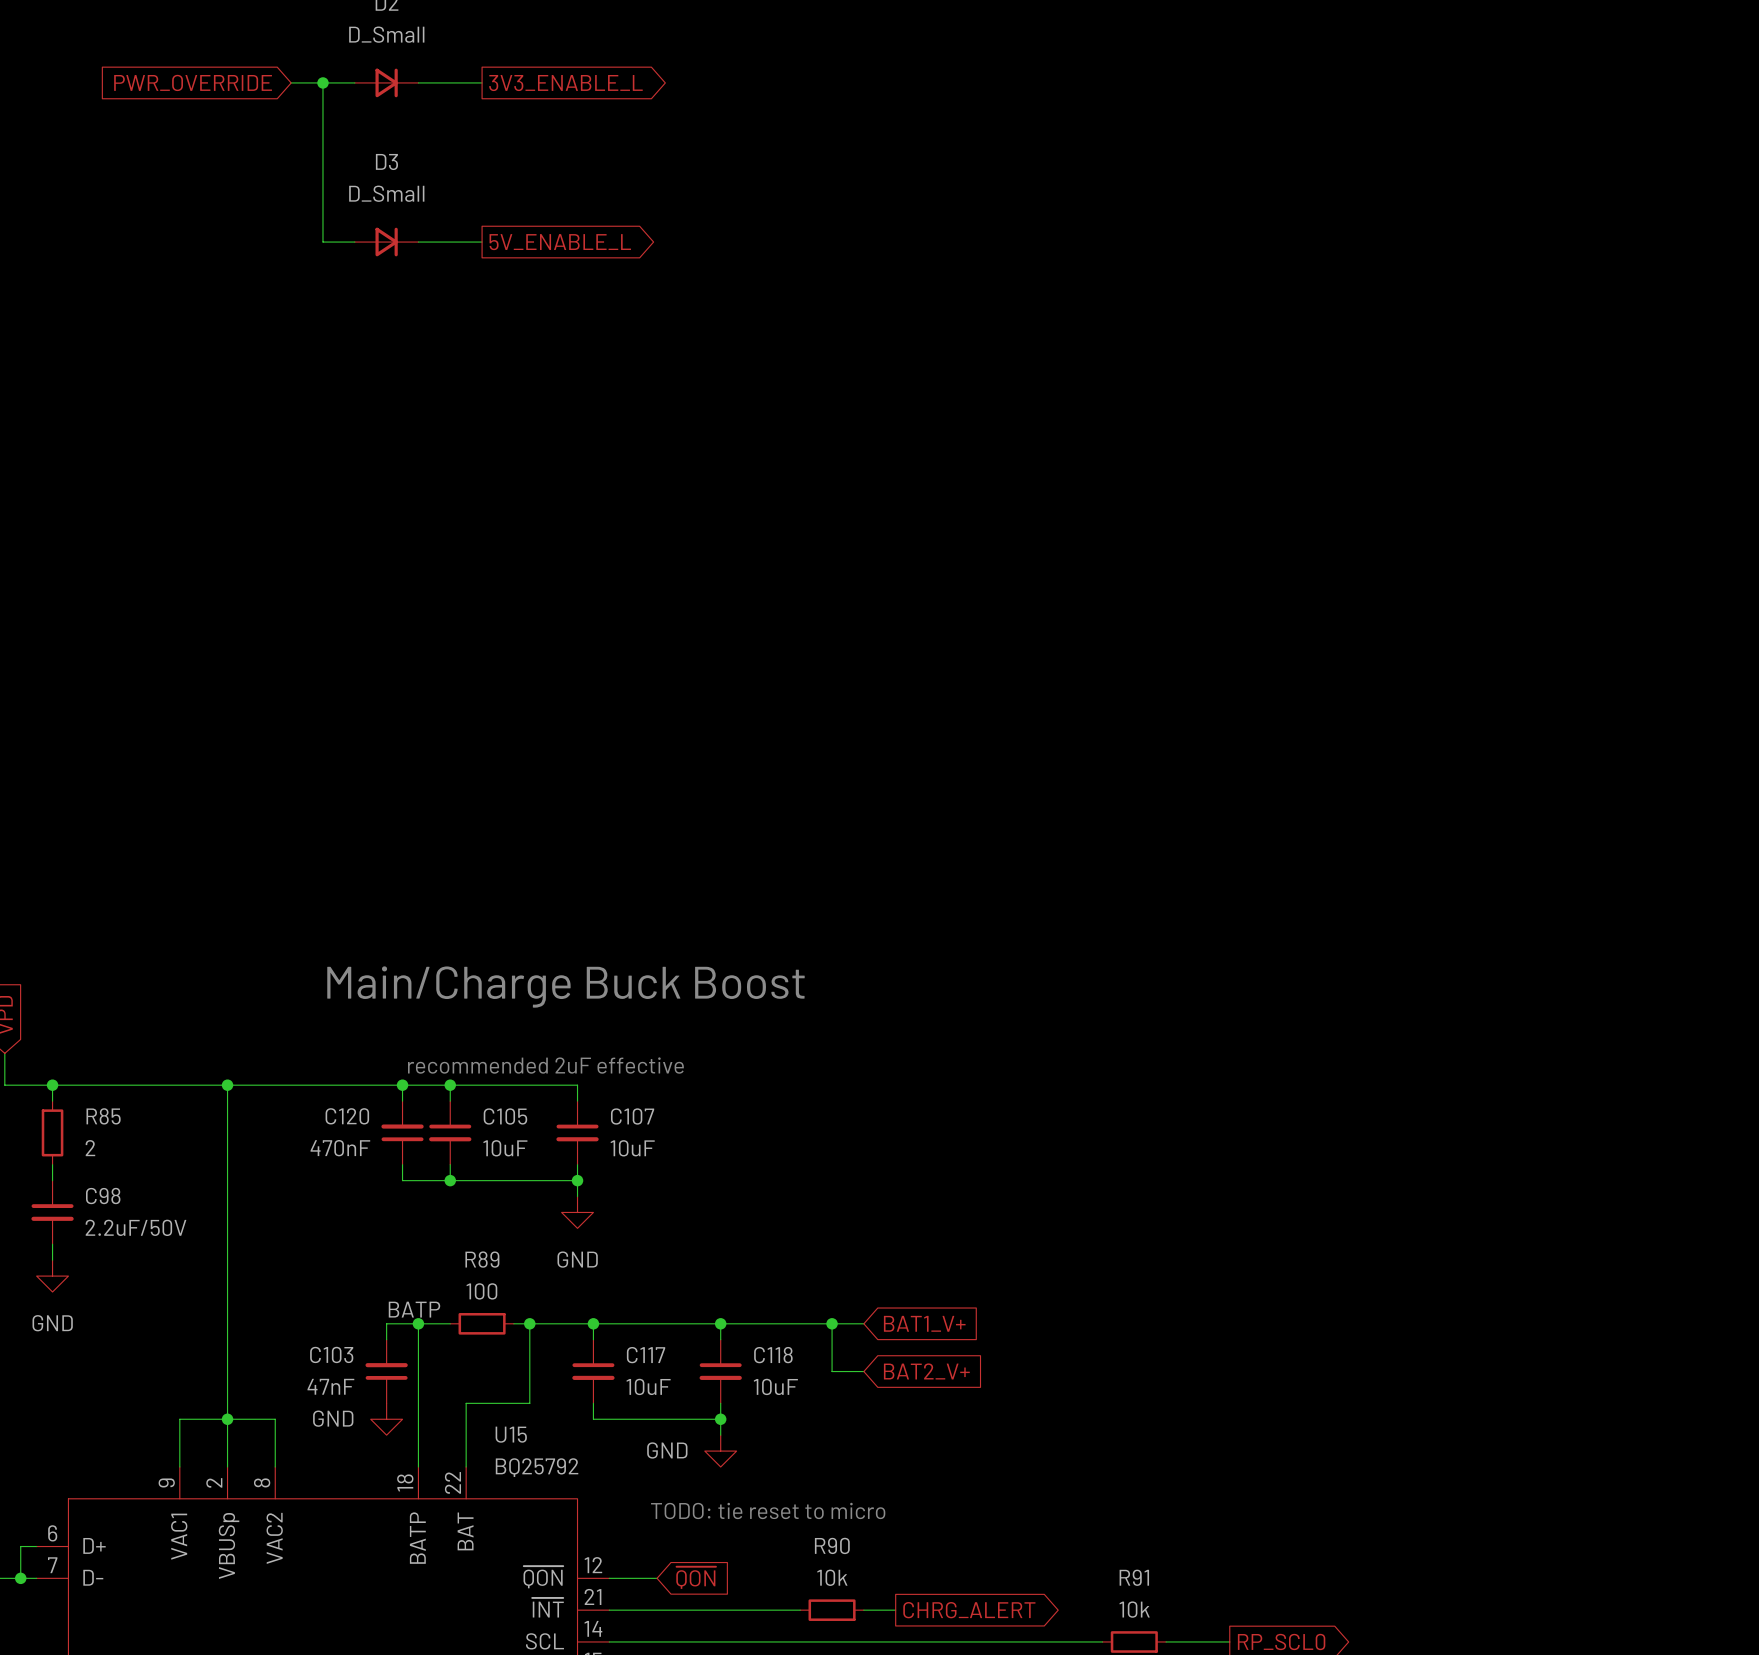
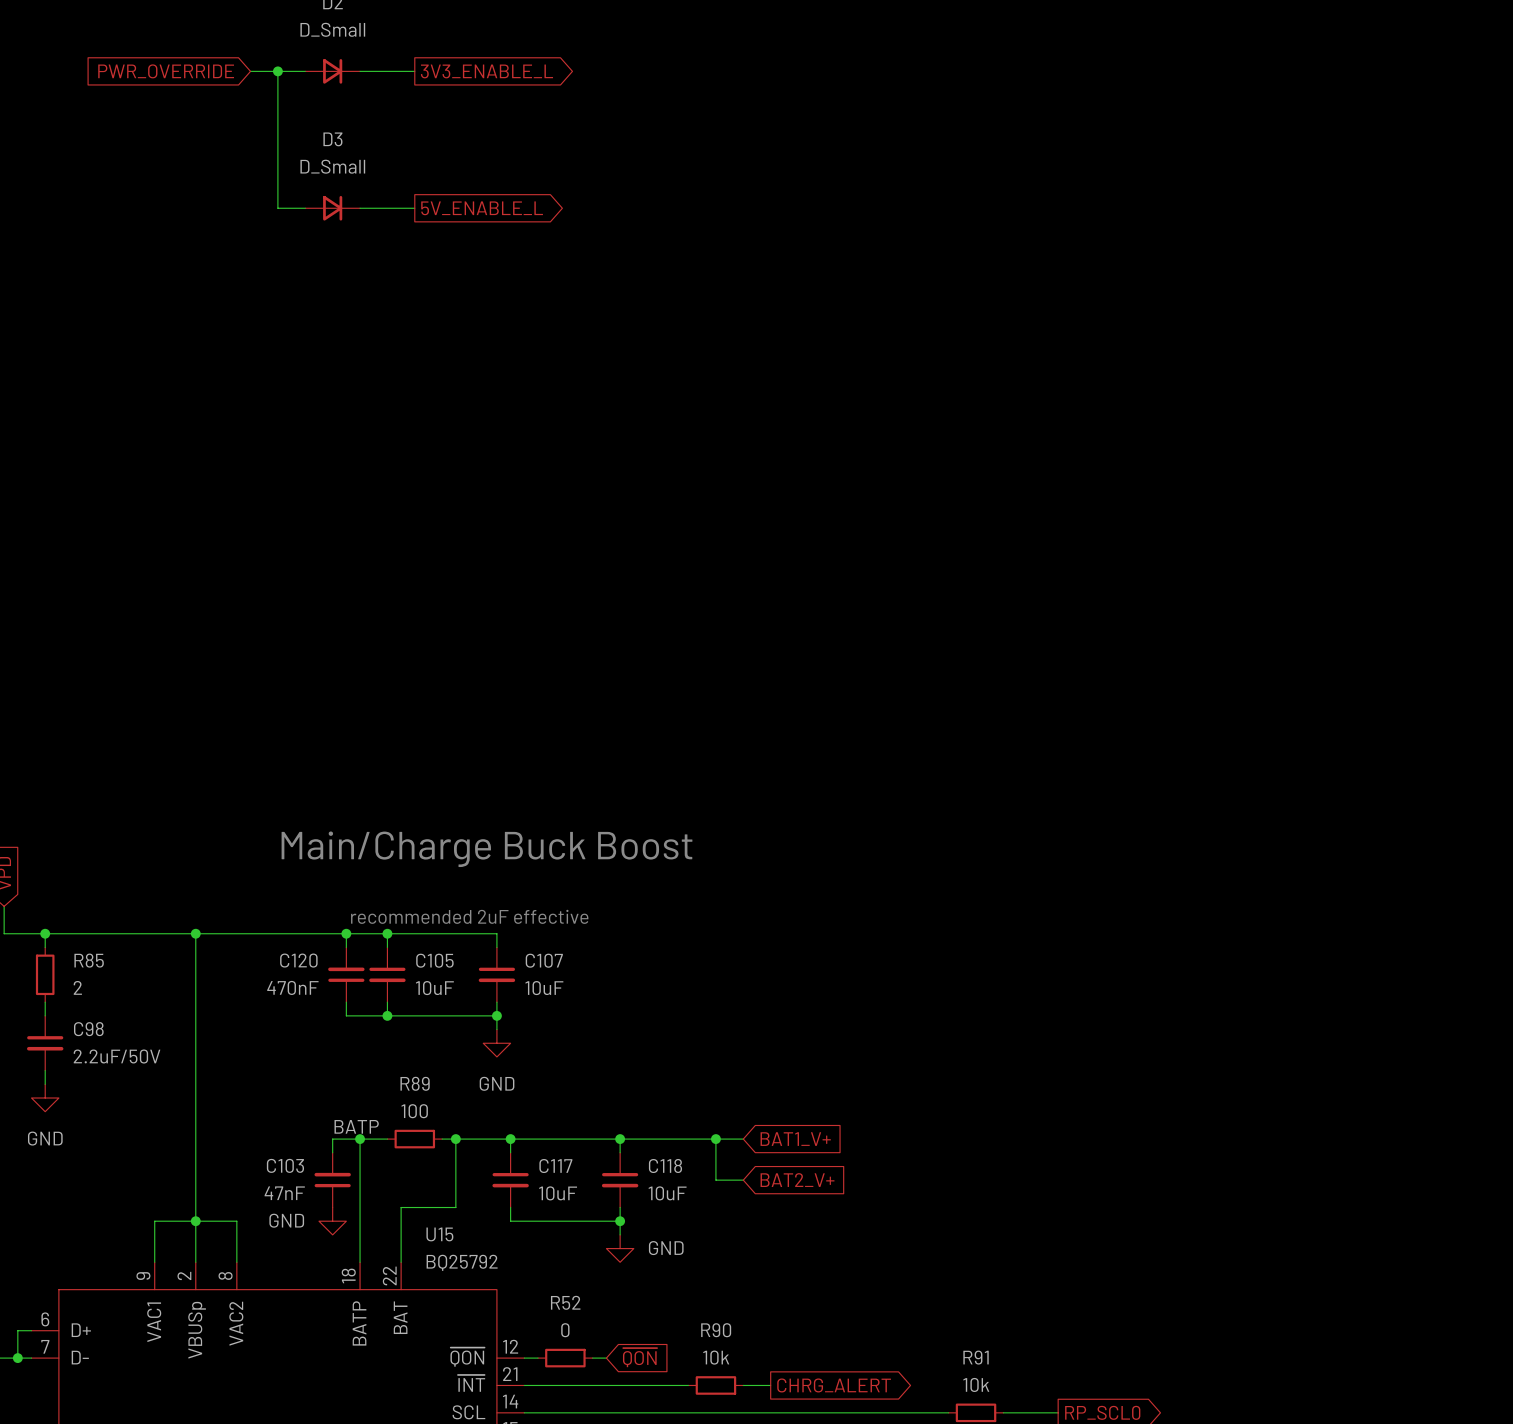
power symbol text position: GND (667, 1450) -> GND (666, 1248)
text: TODO: tie reset to micro (768, 1510) -> none
global label position: ~{QON} (696, 1577) -> ~{QON} (640, 1357)
wire: (625, 1578) (657, 1578) -> none
R52: none -> 0 (565, 1358)
wire: none -> (592, 1358) (606, 1358)

